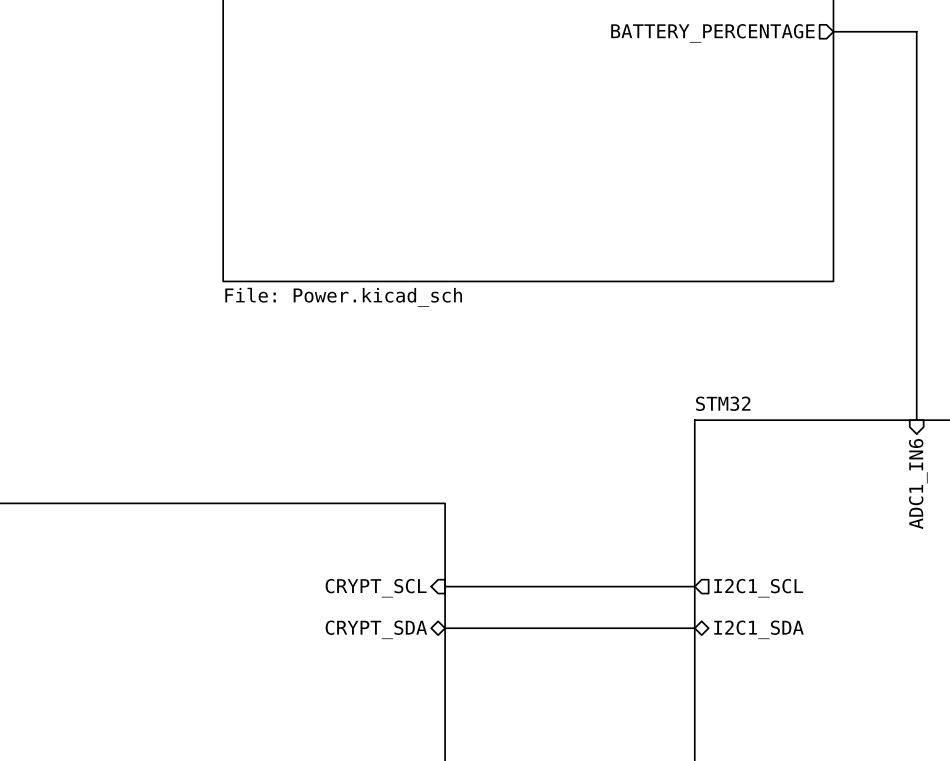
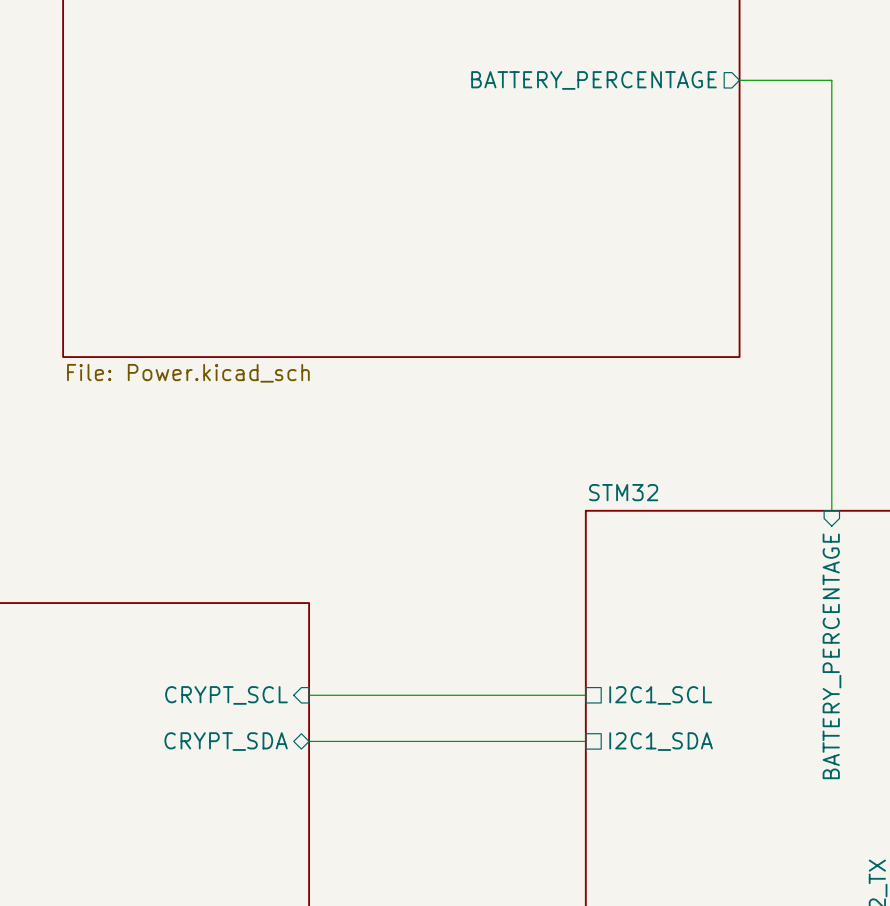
sheet pin: ADC1_IN6 (918, 484) -> BATTERY_PERCENTAGE (831, 656)
sheet pin shape: output (758, 588) -> passive (660, 695)
sheet pin shape: bidirectional (758, 629) -> passive (661, 741)

